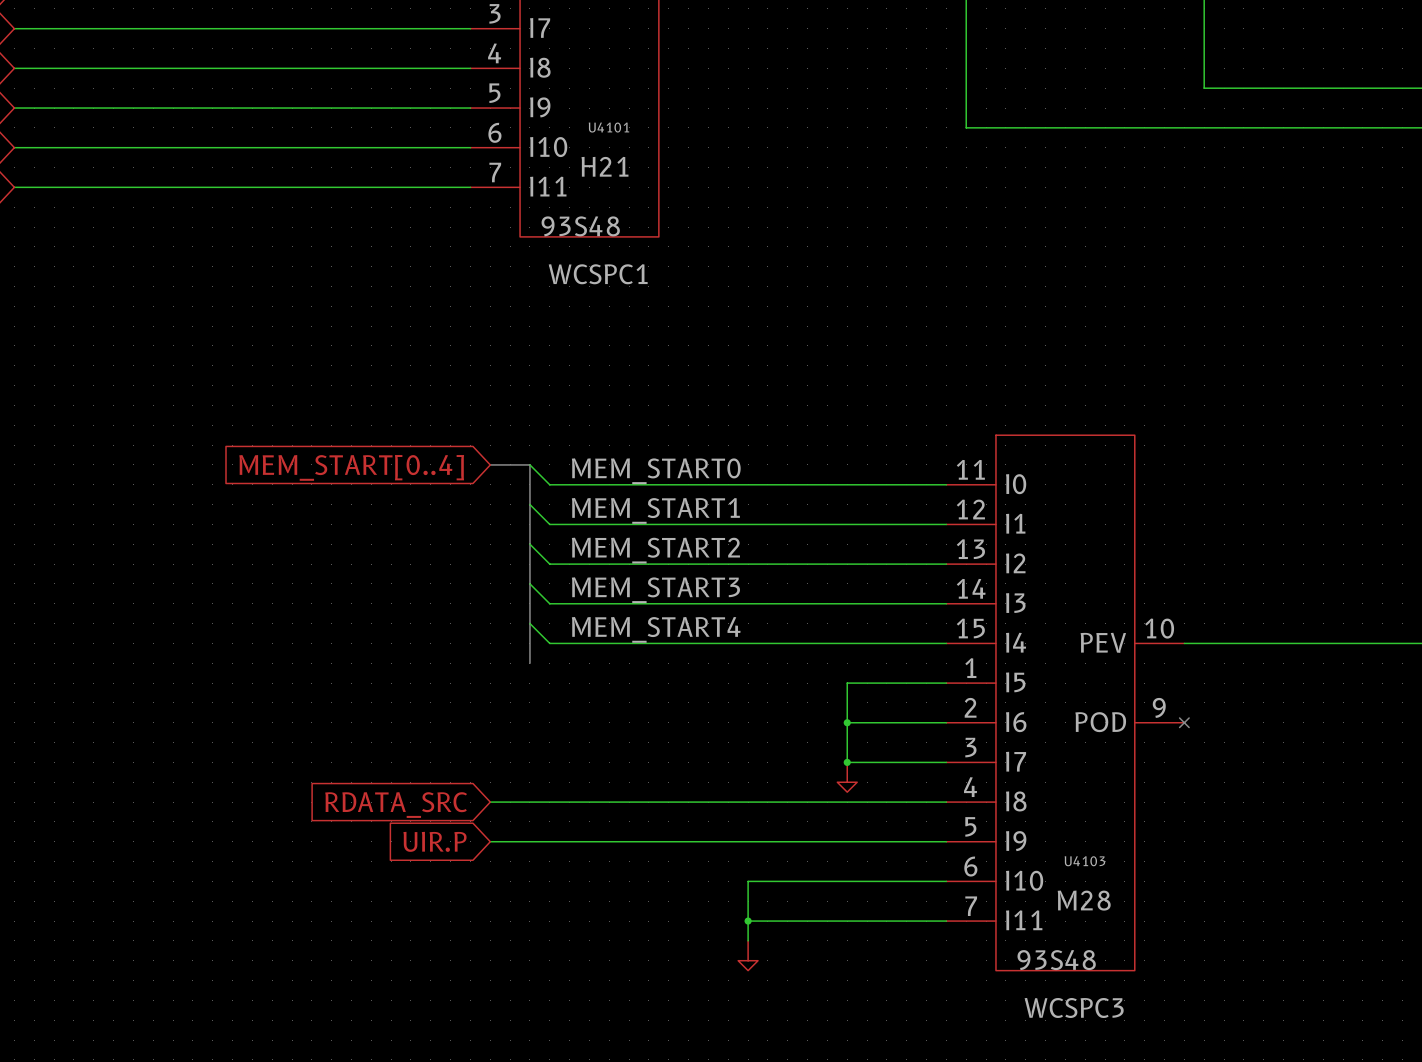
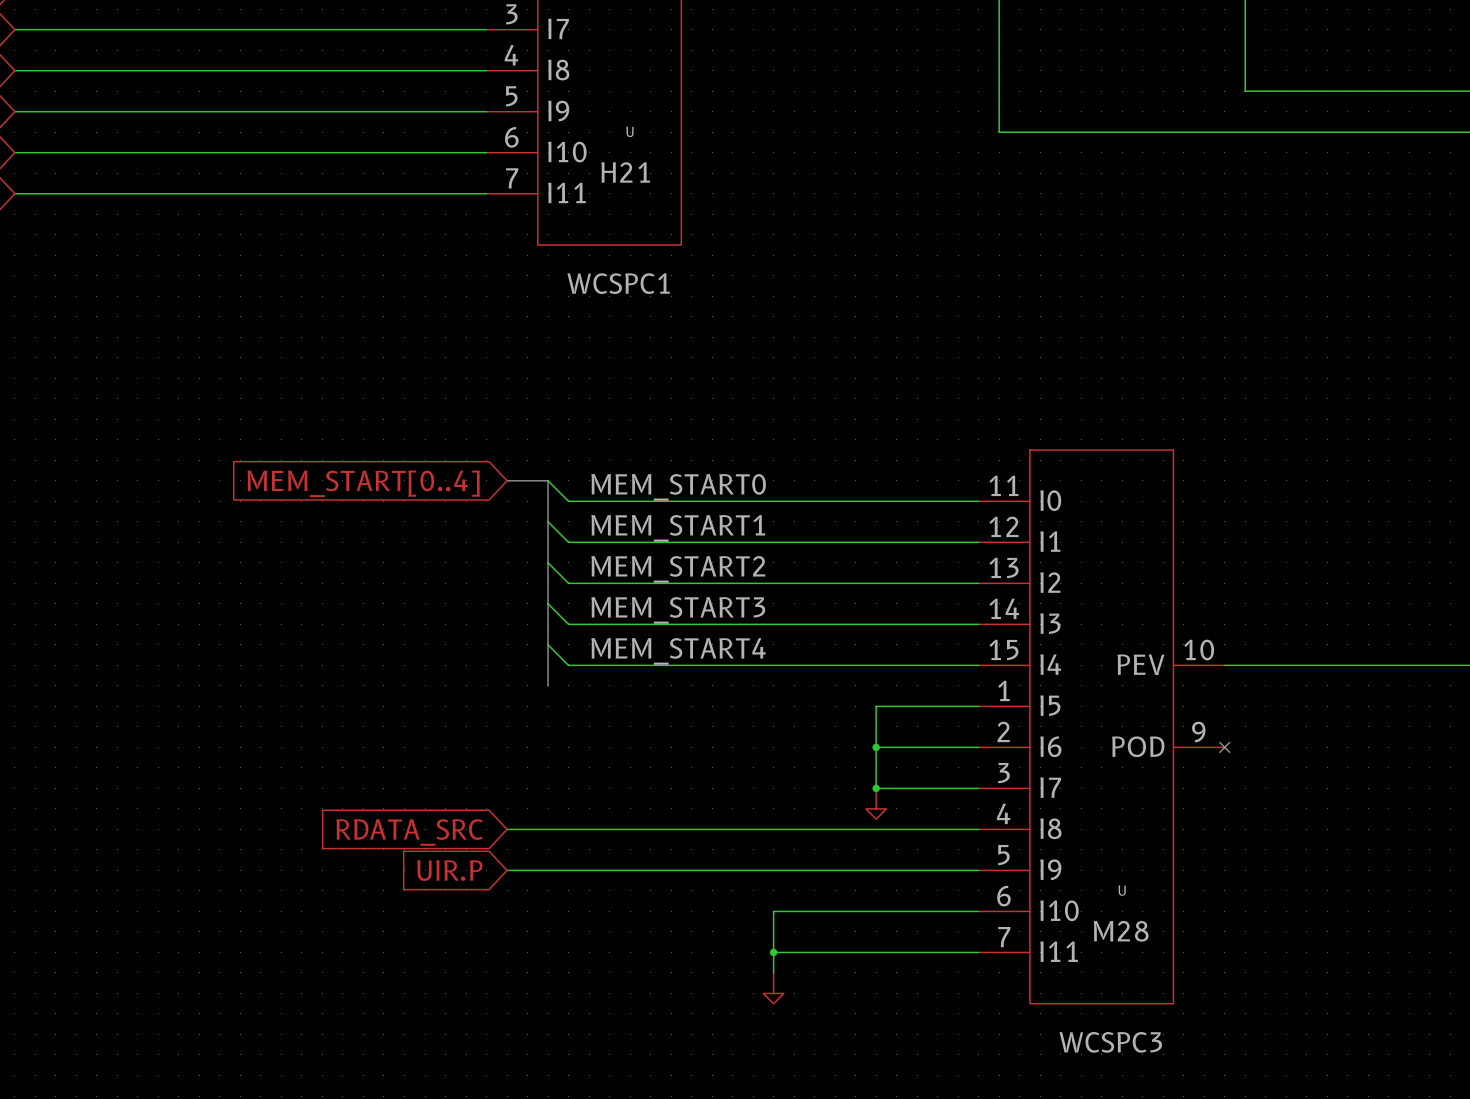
U4101 name: U4101 (608, 127) -> U (629, 131)
U4101 value: 93S48 (580, 226) -> none
U4103 name: U4103 (1084, 861) -> U (1122, 890)
U4103 value: 93S48 (1056, 960) -> none

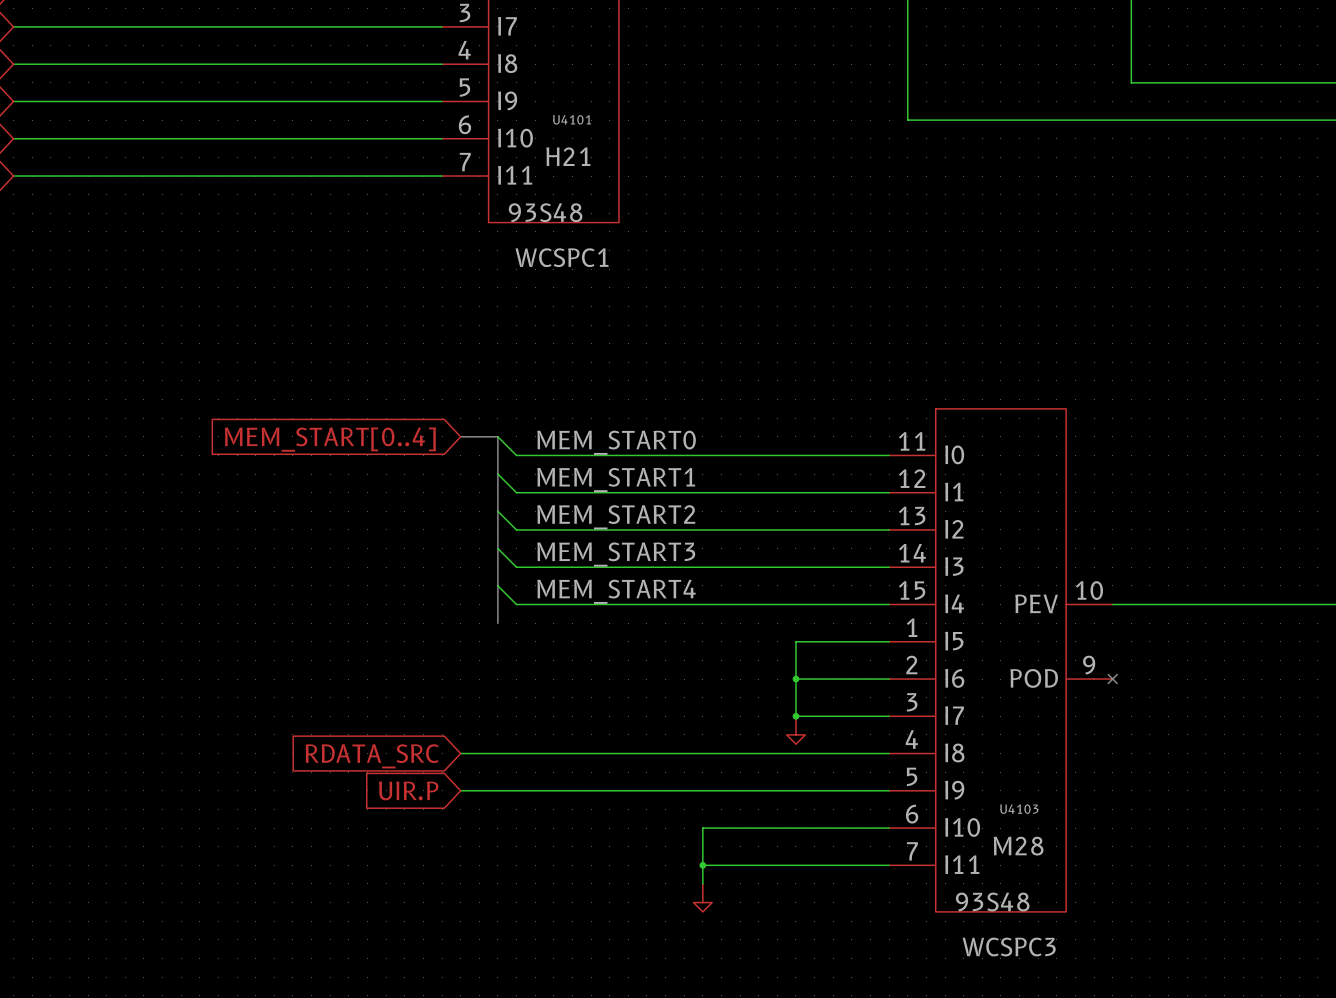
U name: U (629, 131) -> U4101 (572, 119)
U value: none -> 93S48 (545, 212)
U name: U (1122, 890) -> U4103 (1019, 809)
U value: none -> 93S48 (992, 901)

